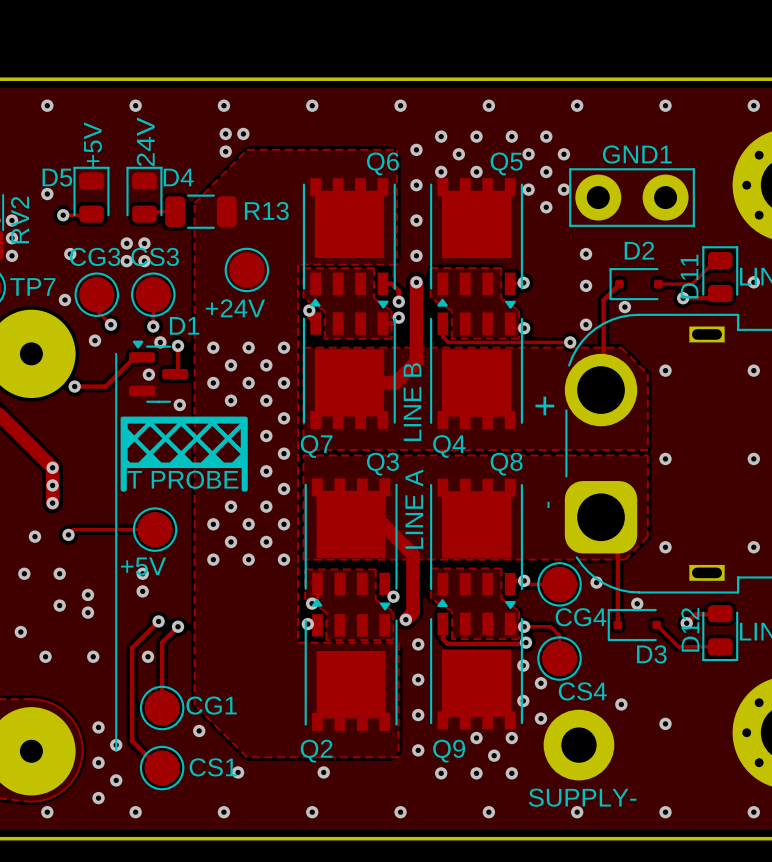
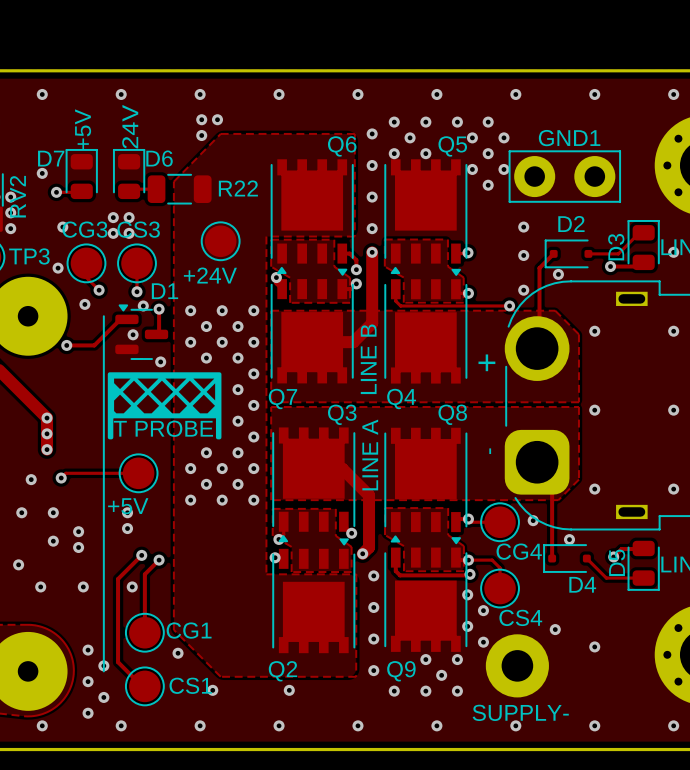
D5 name: D5 (57, 177) -> D7 (51, 158)
D4 name: D4 (178, 177) -> D6 (159, 158)
R13 name: R13 (266, 211) -> R22 (238, 188)
D11 name: D11 (689, 276) -> D3 (616, 247)
TP7 name: TP7 (32, 286) -> TP3 (29, 256)
D12 name: D12 (690, 629) -> D5 (617, 562)
D3 name: D3 (651, 654) -> D4 (582, 584)

